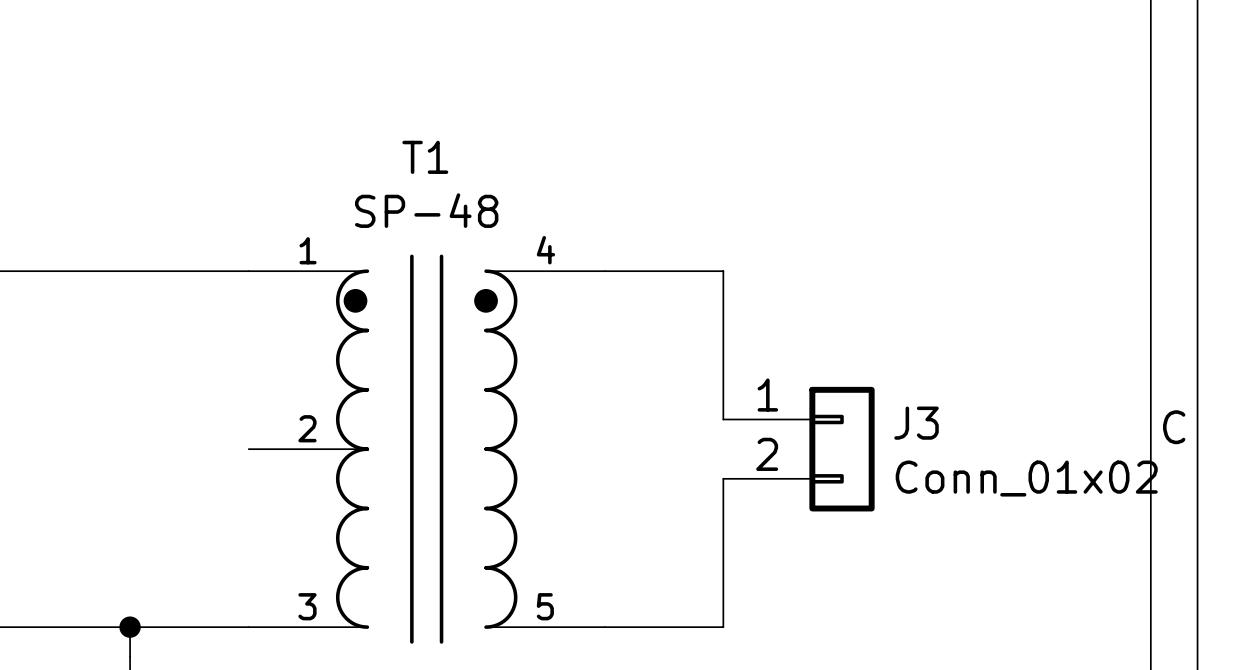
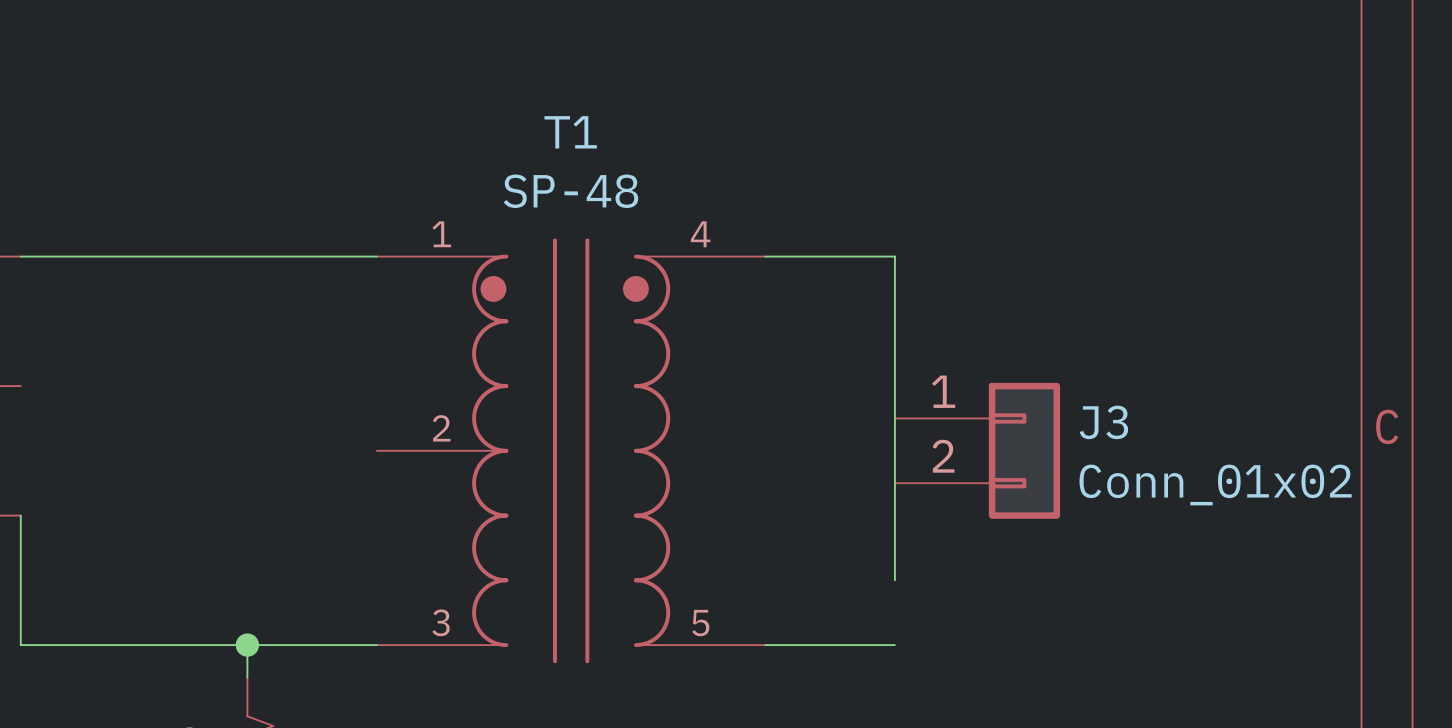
wire: (723, 567) (723, 627) -> (894, 418) (894, 483)

